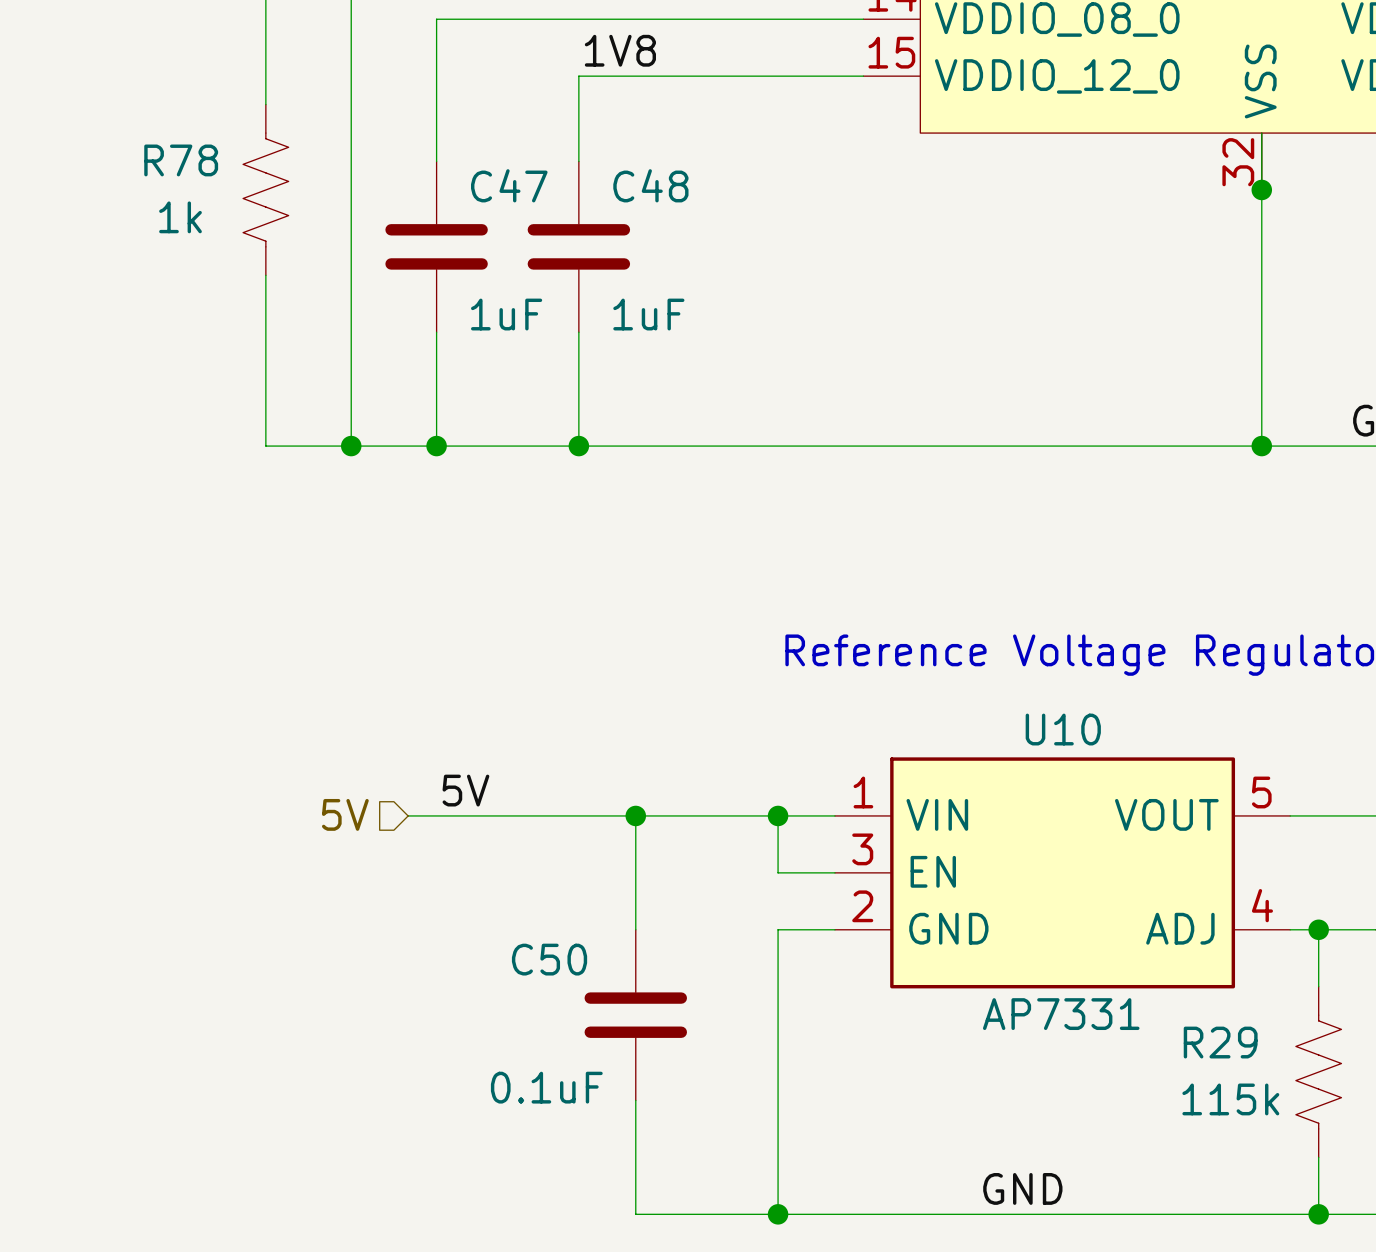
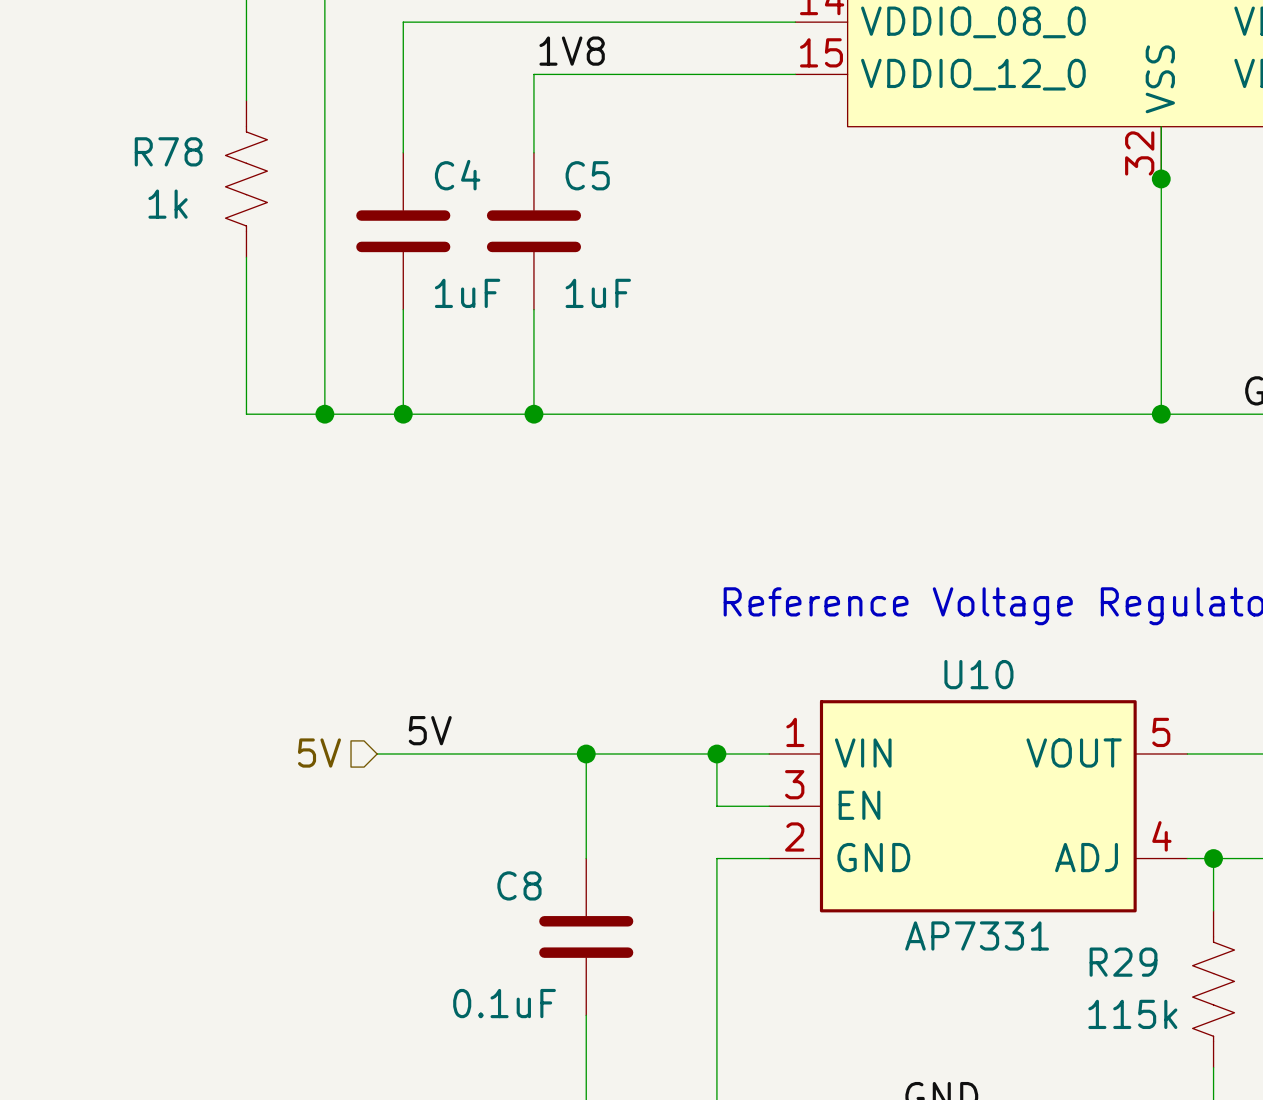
C47 name: C47 (509, 185) -> C4 (457, 175)
C48 name: C48 (650, 185) -> C5 (587, 175)
C50 name: C50 (549, 959) -> C8 (519, 885)

